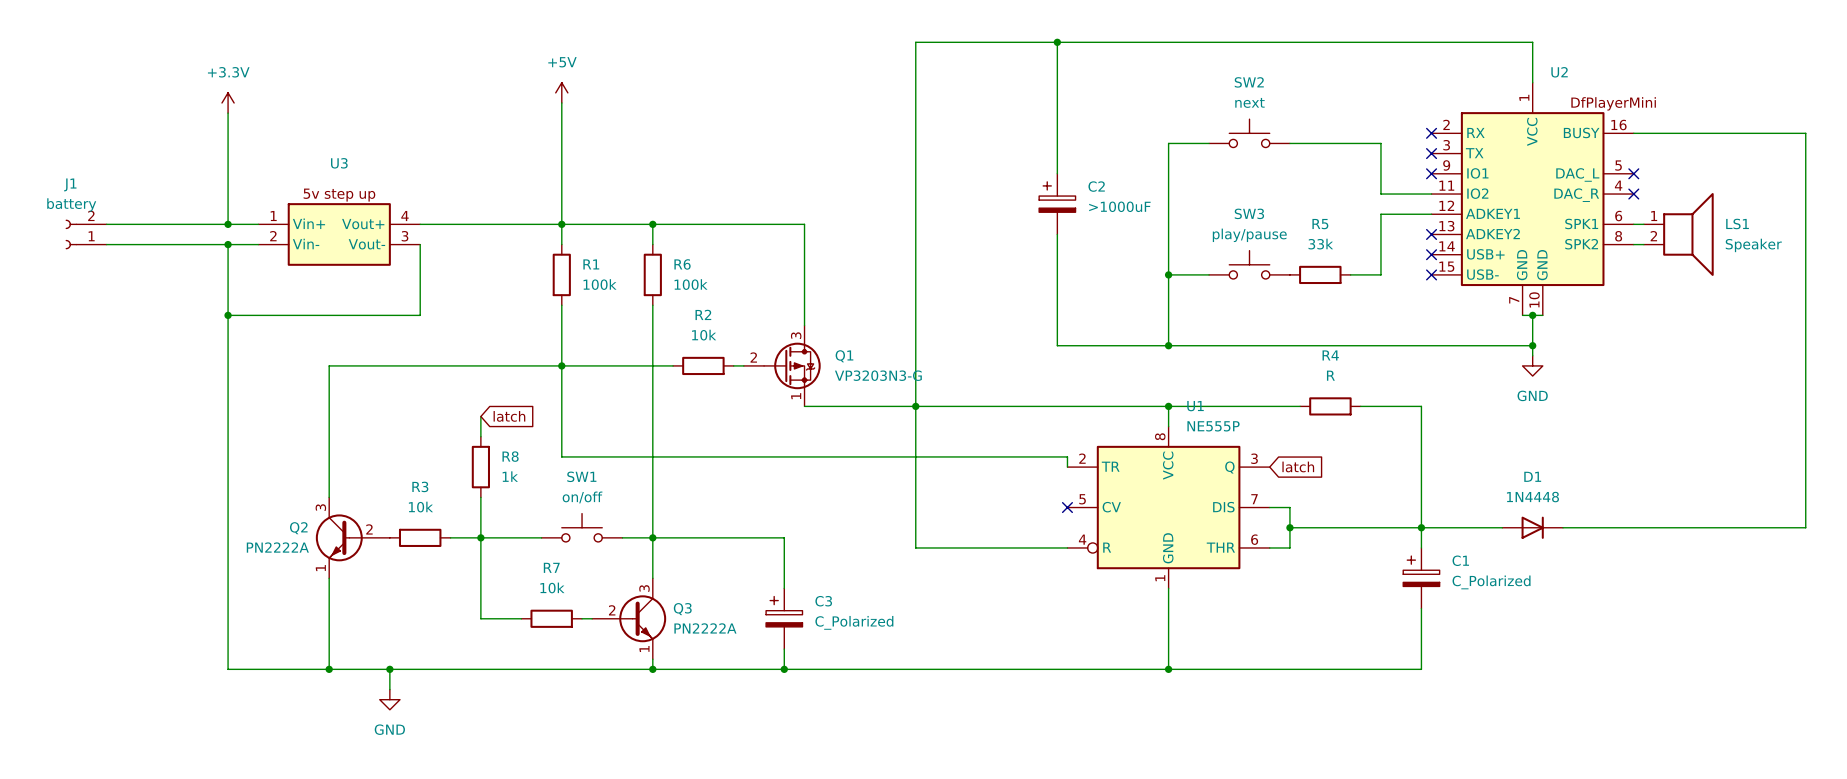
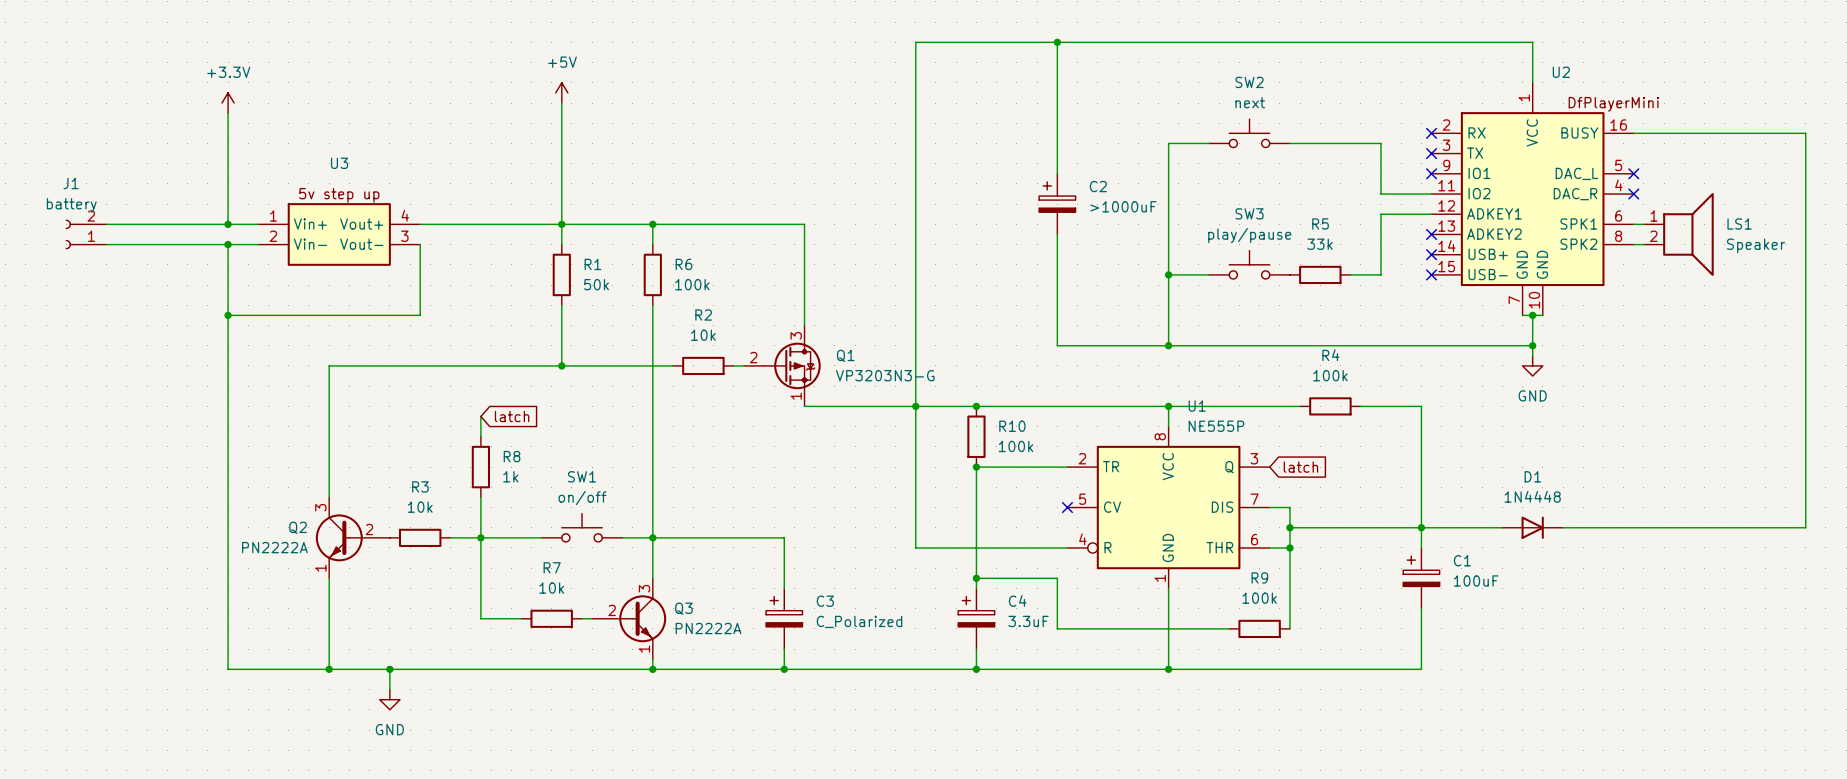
R1 value: 100k (600, 284) -> 50k (596, 284)
wire: (561, 365) (561, 456) (1067, 456) (1067, 467) -> (976, 588) (976, 467) (1067, 467)
R4 value: R (1330, 375) -> 100k (1330, 375)
junction: none -> (976, 406)
R10: none -> 100k (976, 436)
junction: none -> (976, 467)
wire: none -> (1289, 547) (1289, 628)
junction: none -> (1289, 547)
wire: none -> (976, 578) (1057, 578) (1057, 628) (1229, 628)
junction: none -> (976, 578)
C1 value: C_Polarized (1491, 582) -> 100uF (1476, 580)
C4: none -> 3.3uF (976, 618)
R9: none -> 100k (1259, 628)
wire: none -> (976, 649) (976, 669)
junction: none -> (976, 669)

